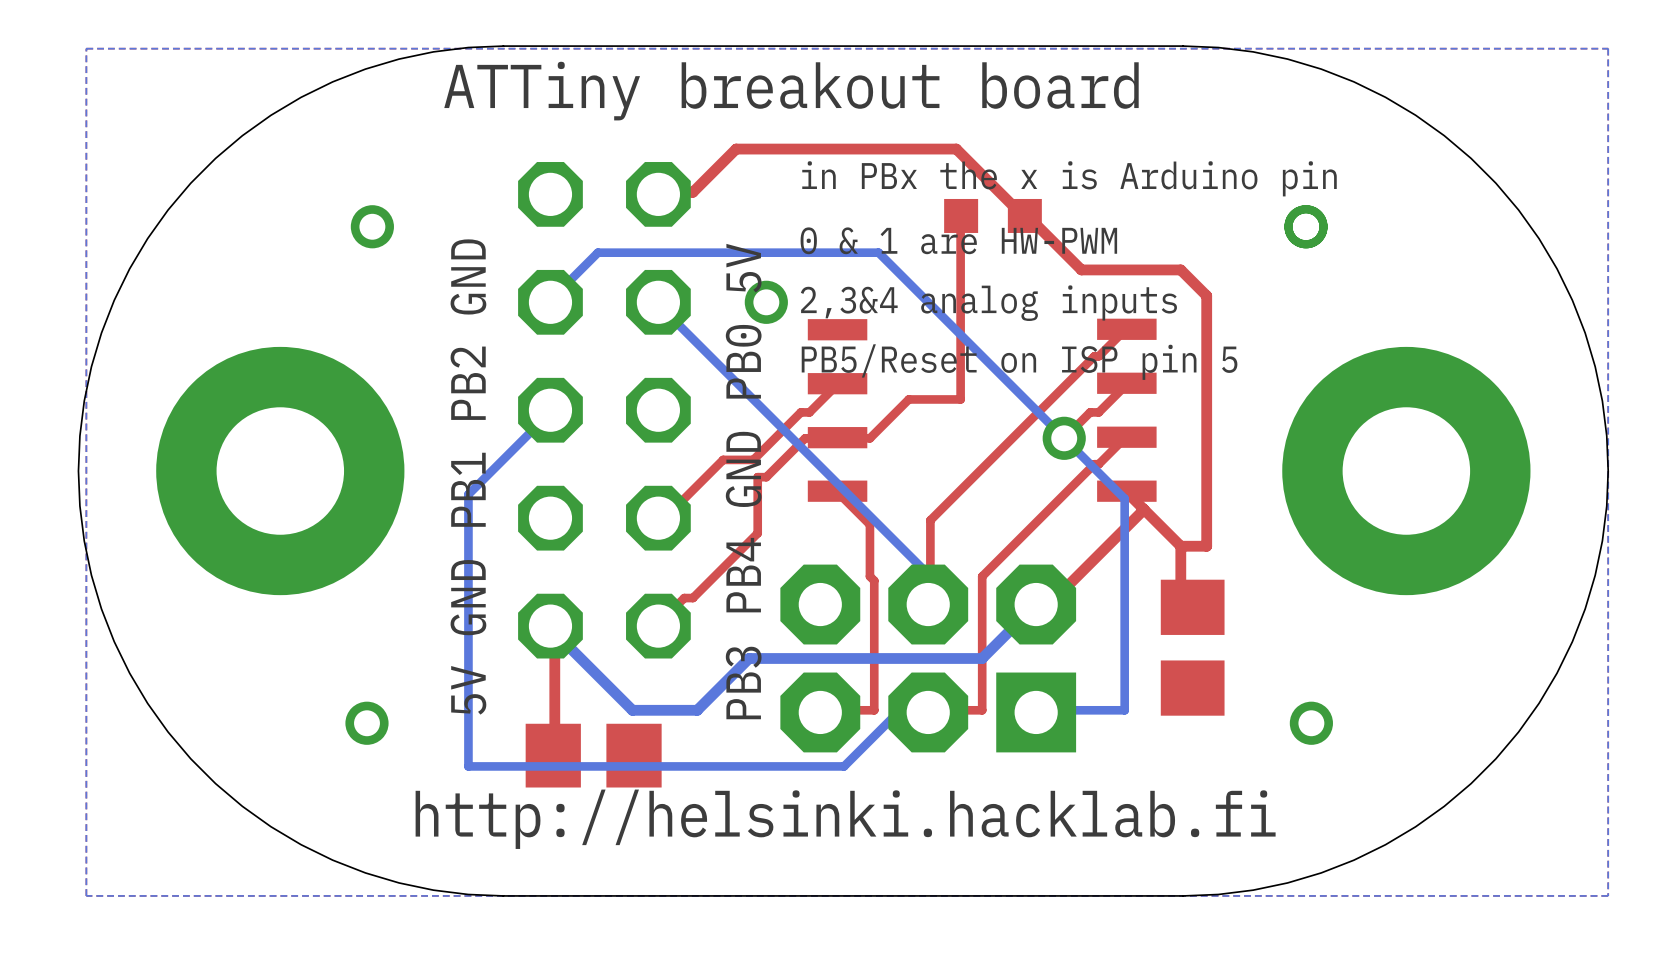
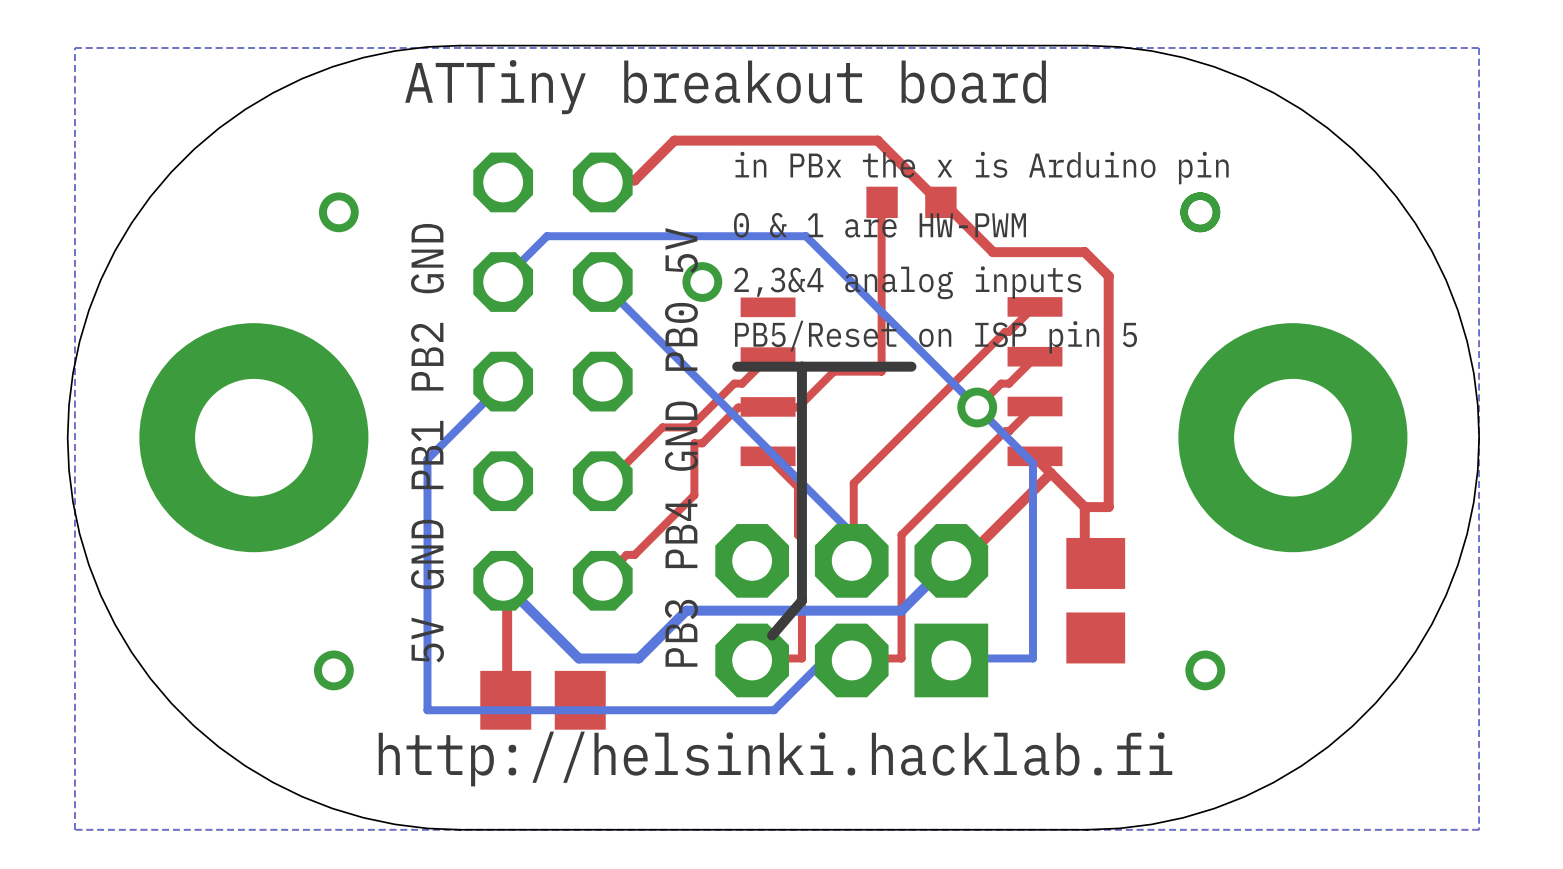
line: none -> (801, 366) (801, 600) (772, 635)
line: none -> (911, 366) (737, 366)

